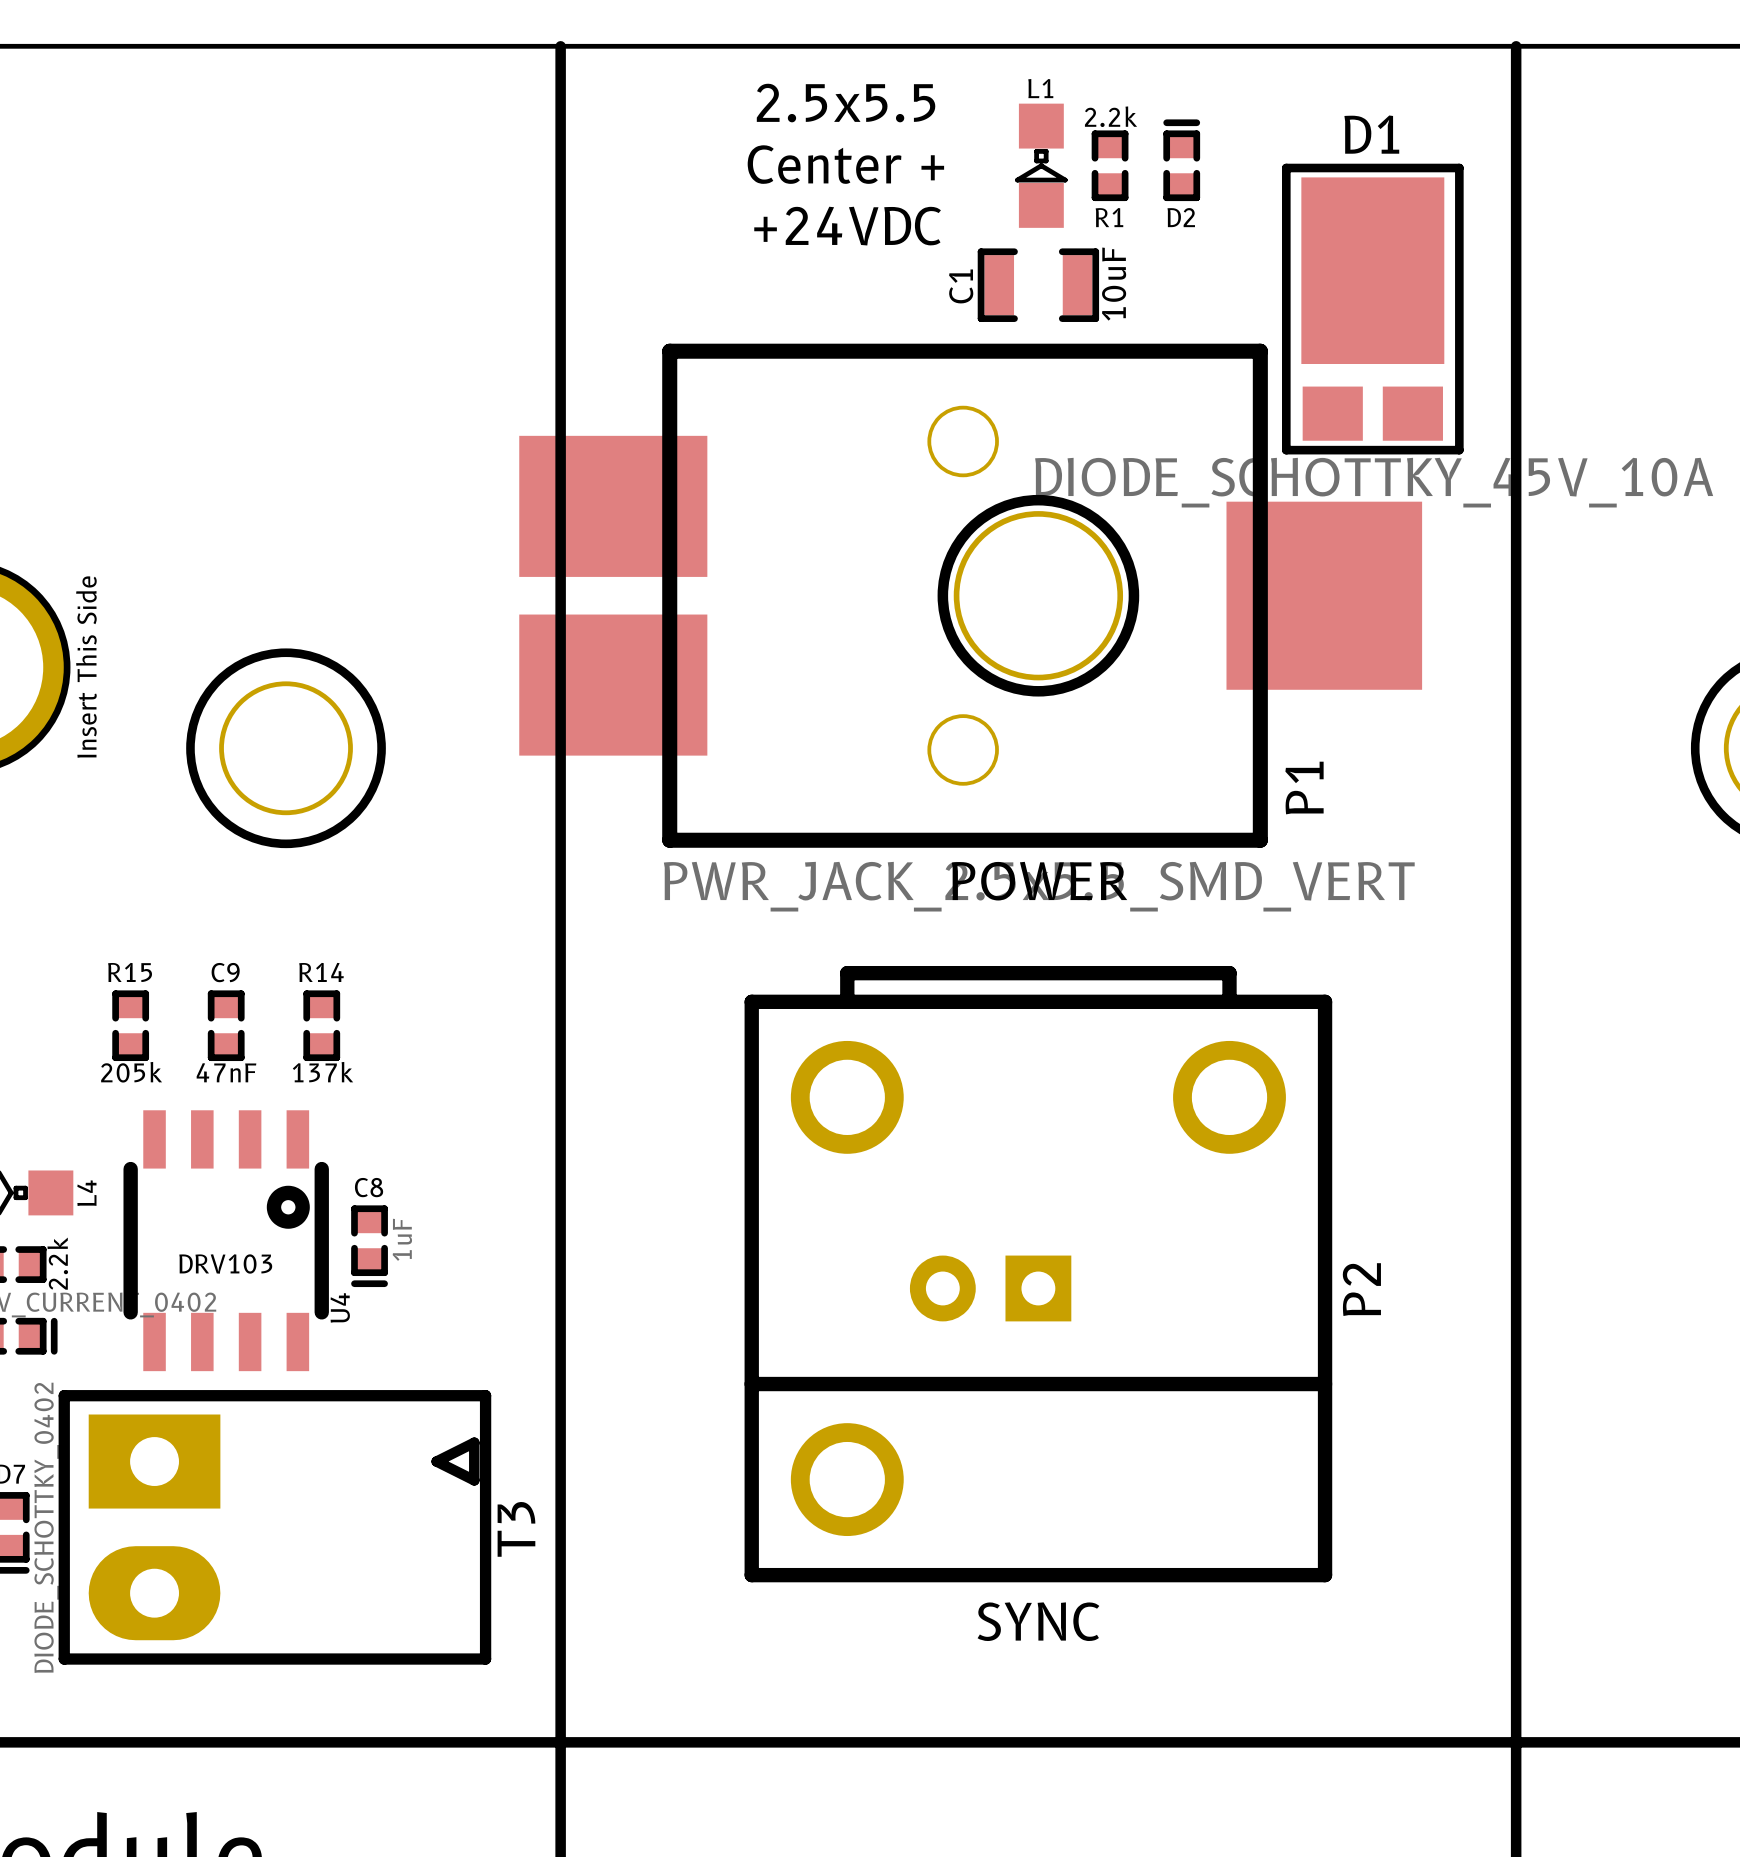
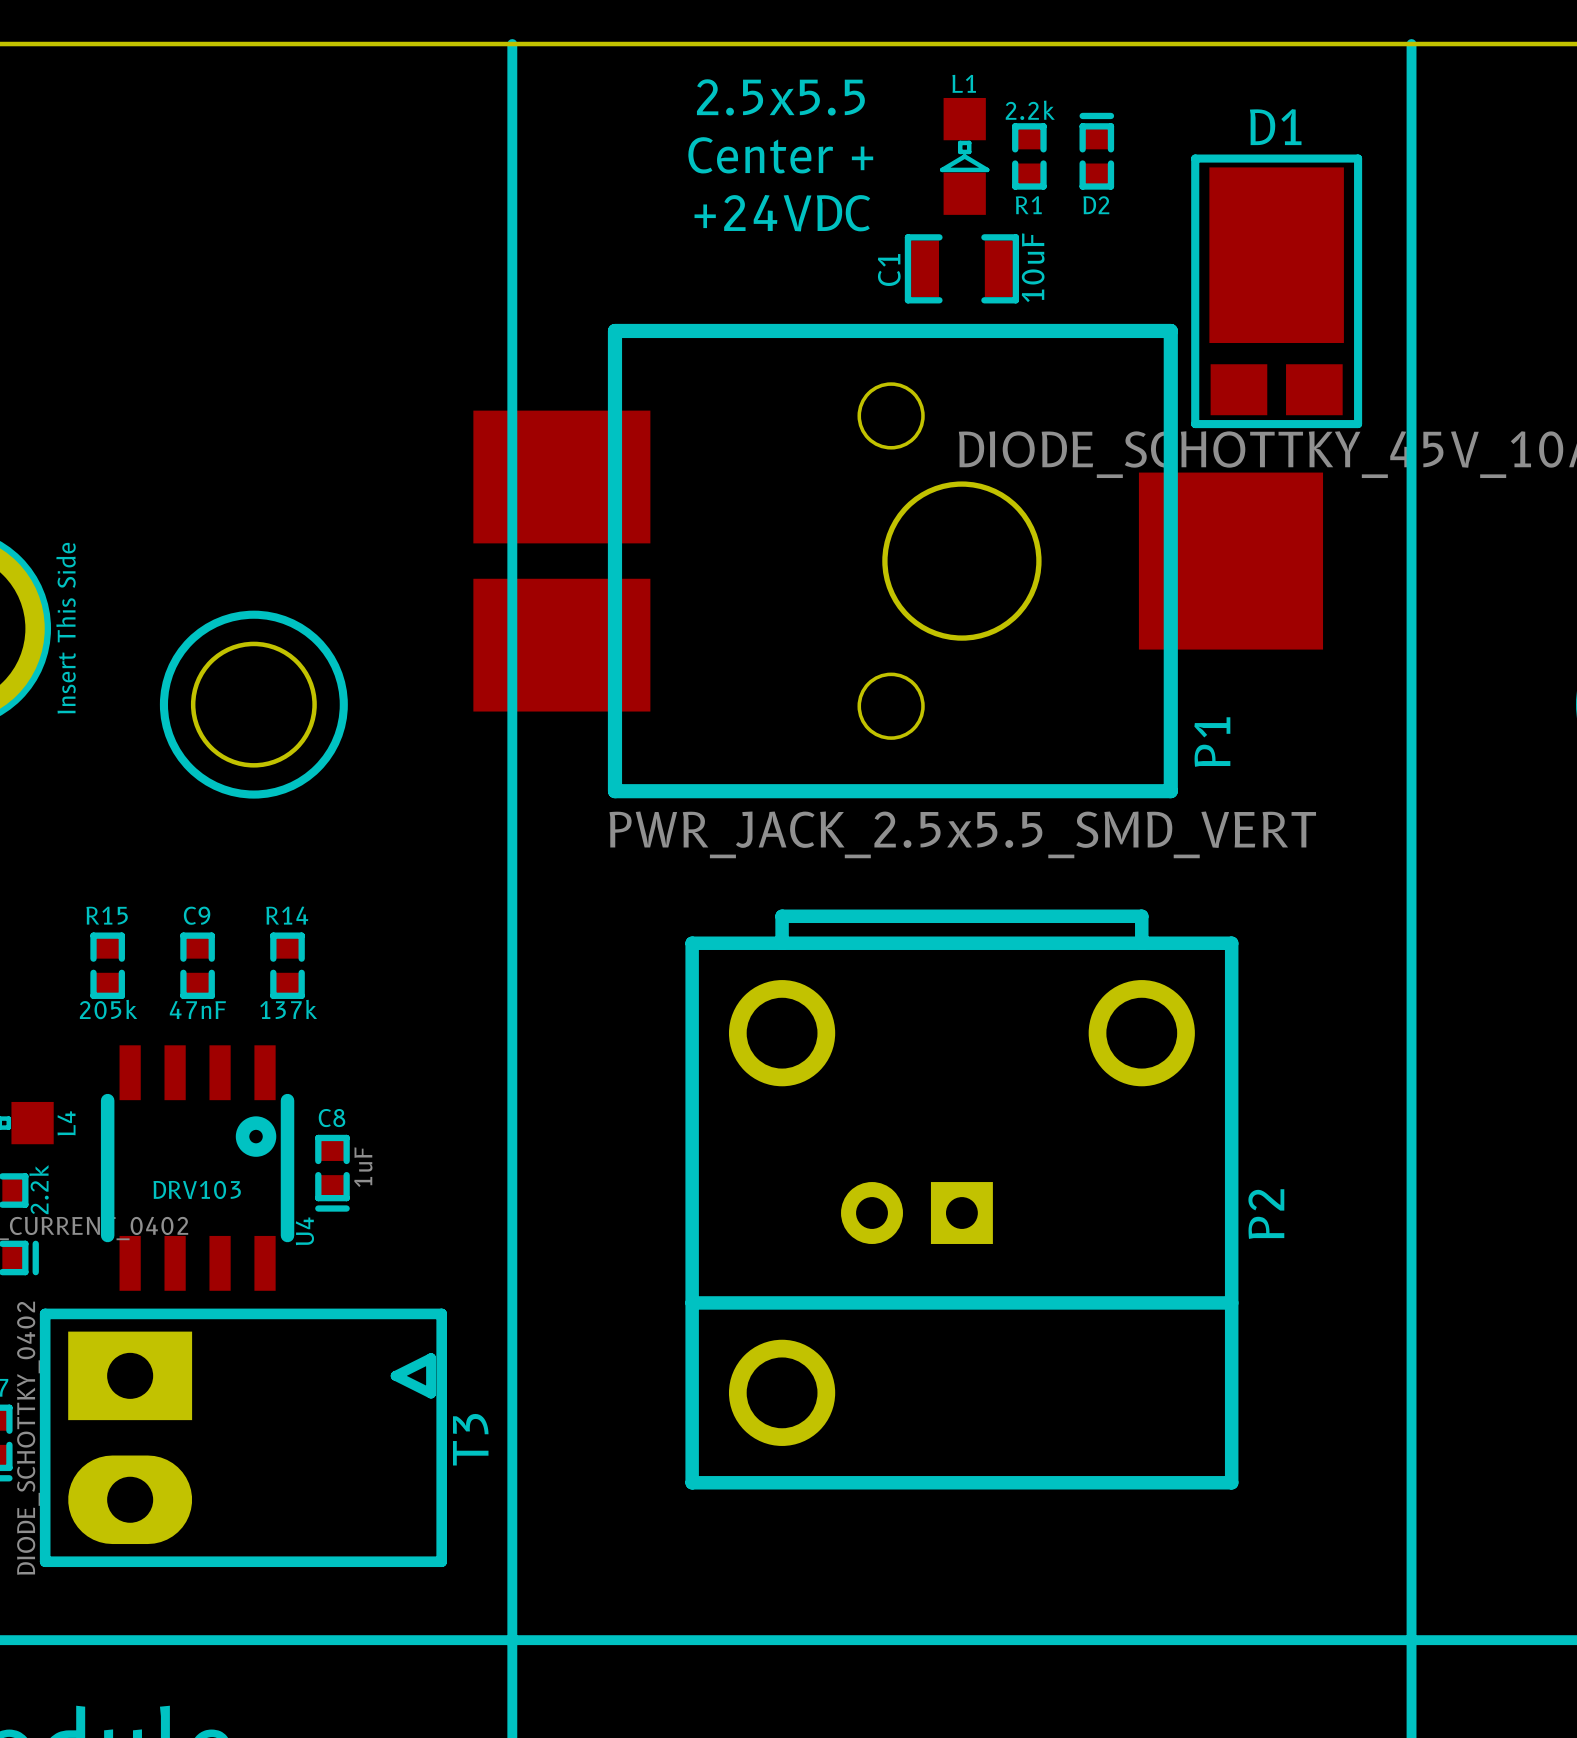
P1 footprint: [519, 343, 1423, 848] -> [473, 323, 1324, 799]
text: POWER (1039, 881) -> none
text: SYNC (1038, 1621) -> none

